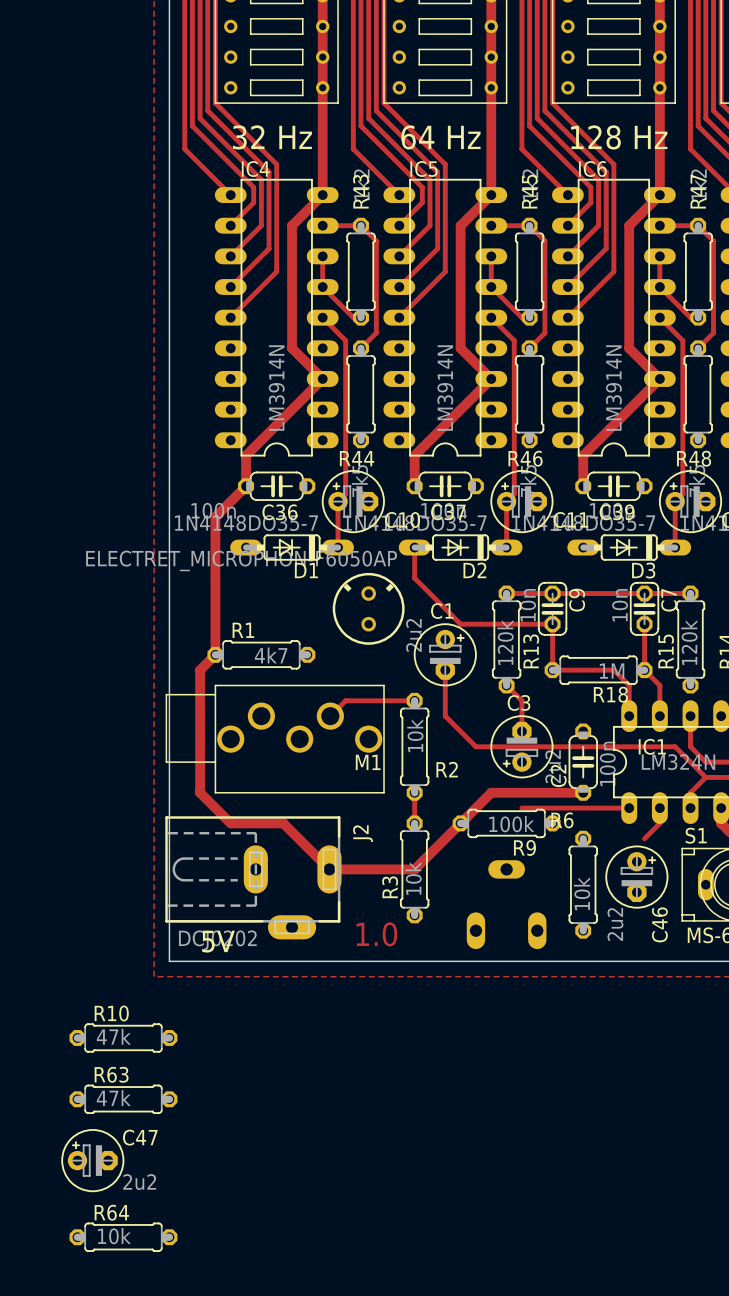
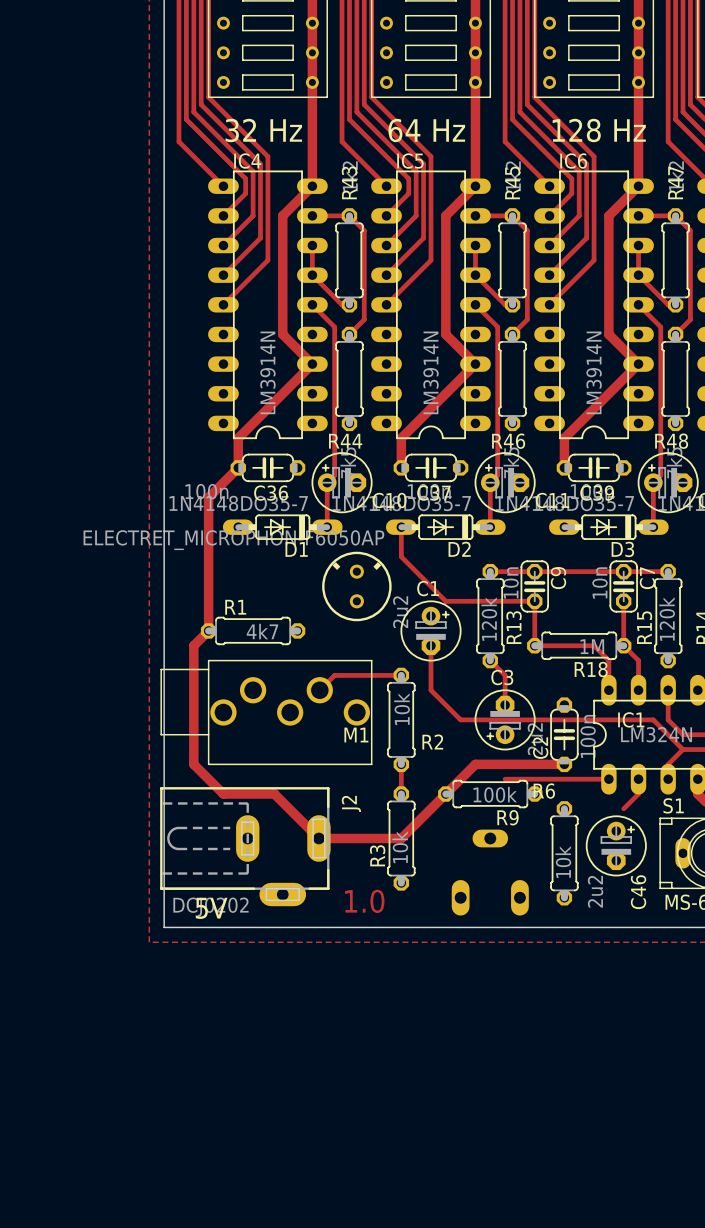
R10: 47k (123, 1037) -> none
R63: 47k (123, 1099) -> none
C47: 2u2 (92, 1160) -> none
R64: 10k (123, 1237) -> none

